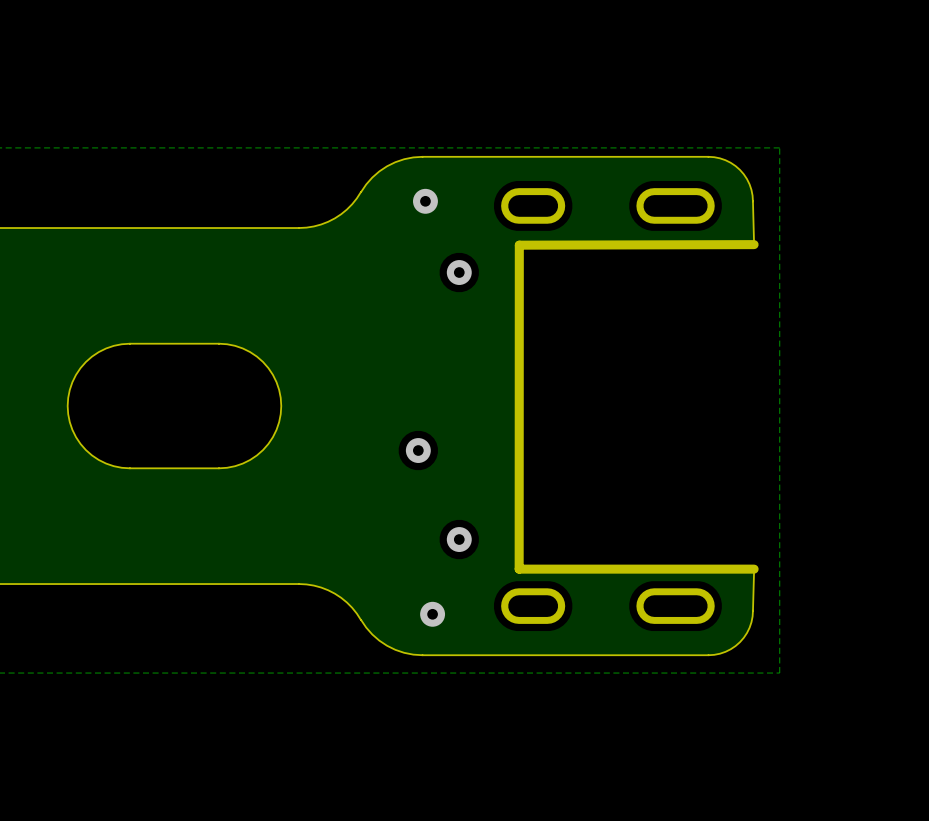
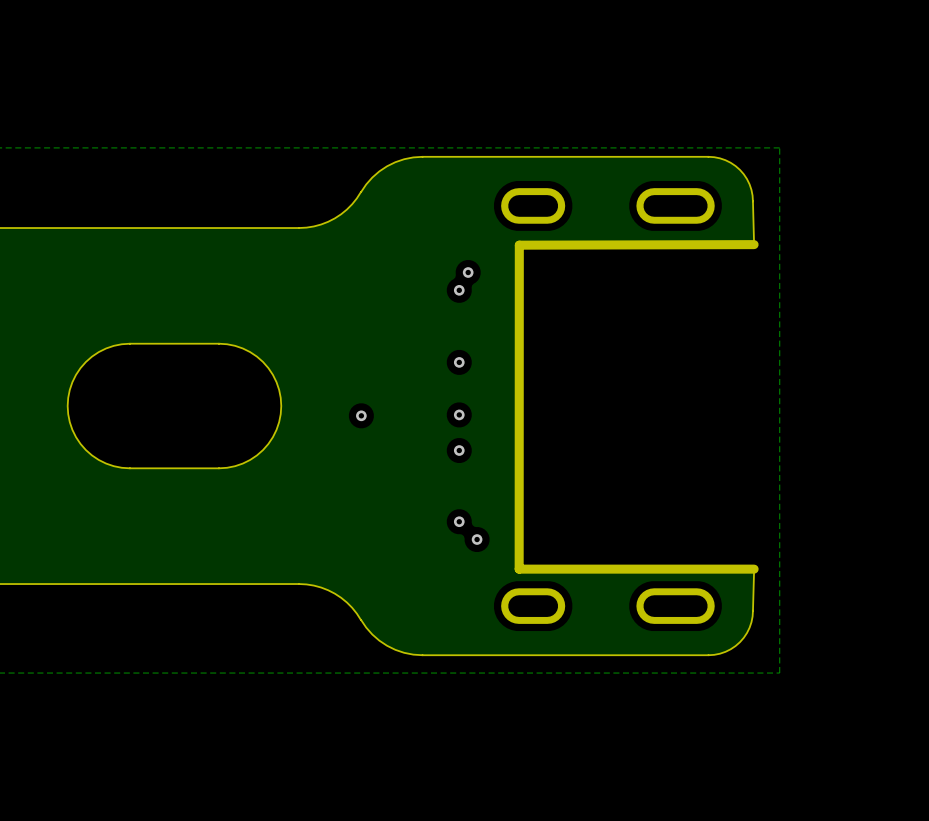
via: (425, 201) -> none
via: (459, 272) -> none
via: none -> (468, 272)
via: none -> (459, 290)
via: none -> (459, 362)
via: none -> (459, 414)
via: none -> (361, 415)
via: (418, 450) -> none
via: none -> (459, 450)
via: none -> (459, 521)
via: (459, 539) -> none
via: none -> (477, 539)
via: (432, 614) -> none

